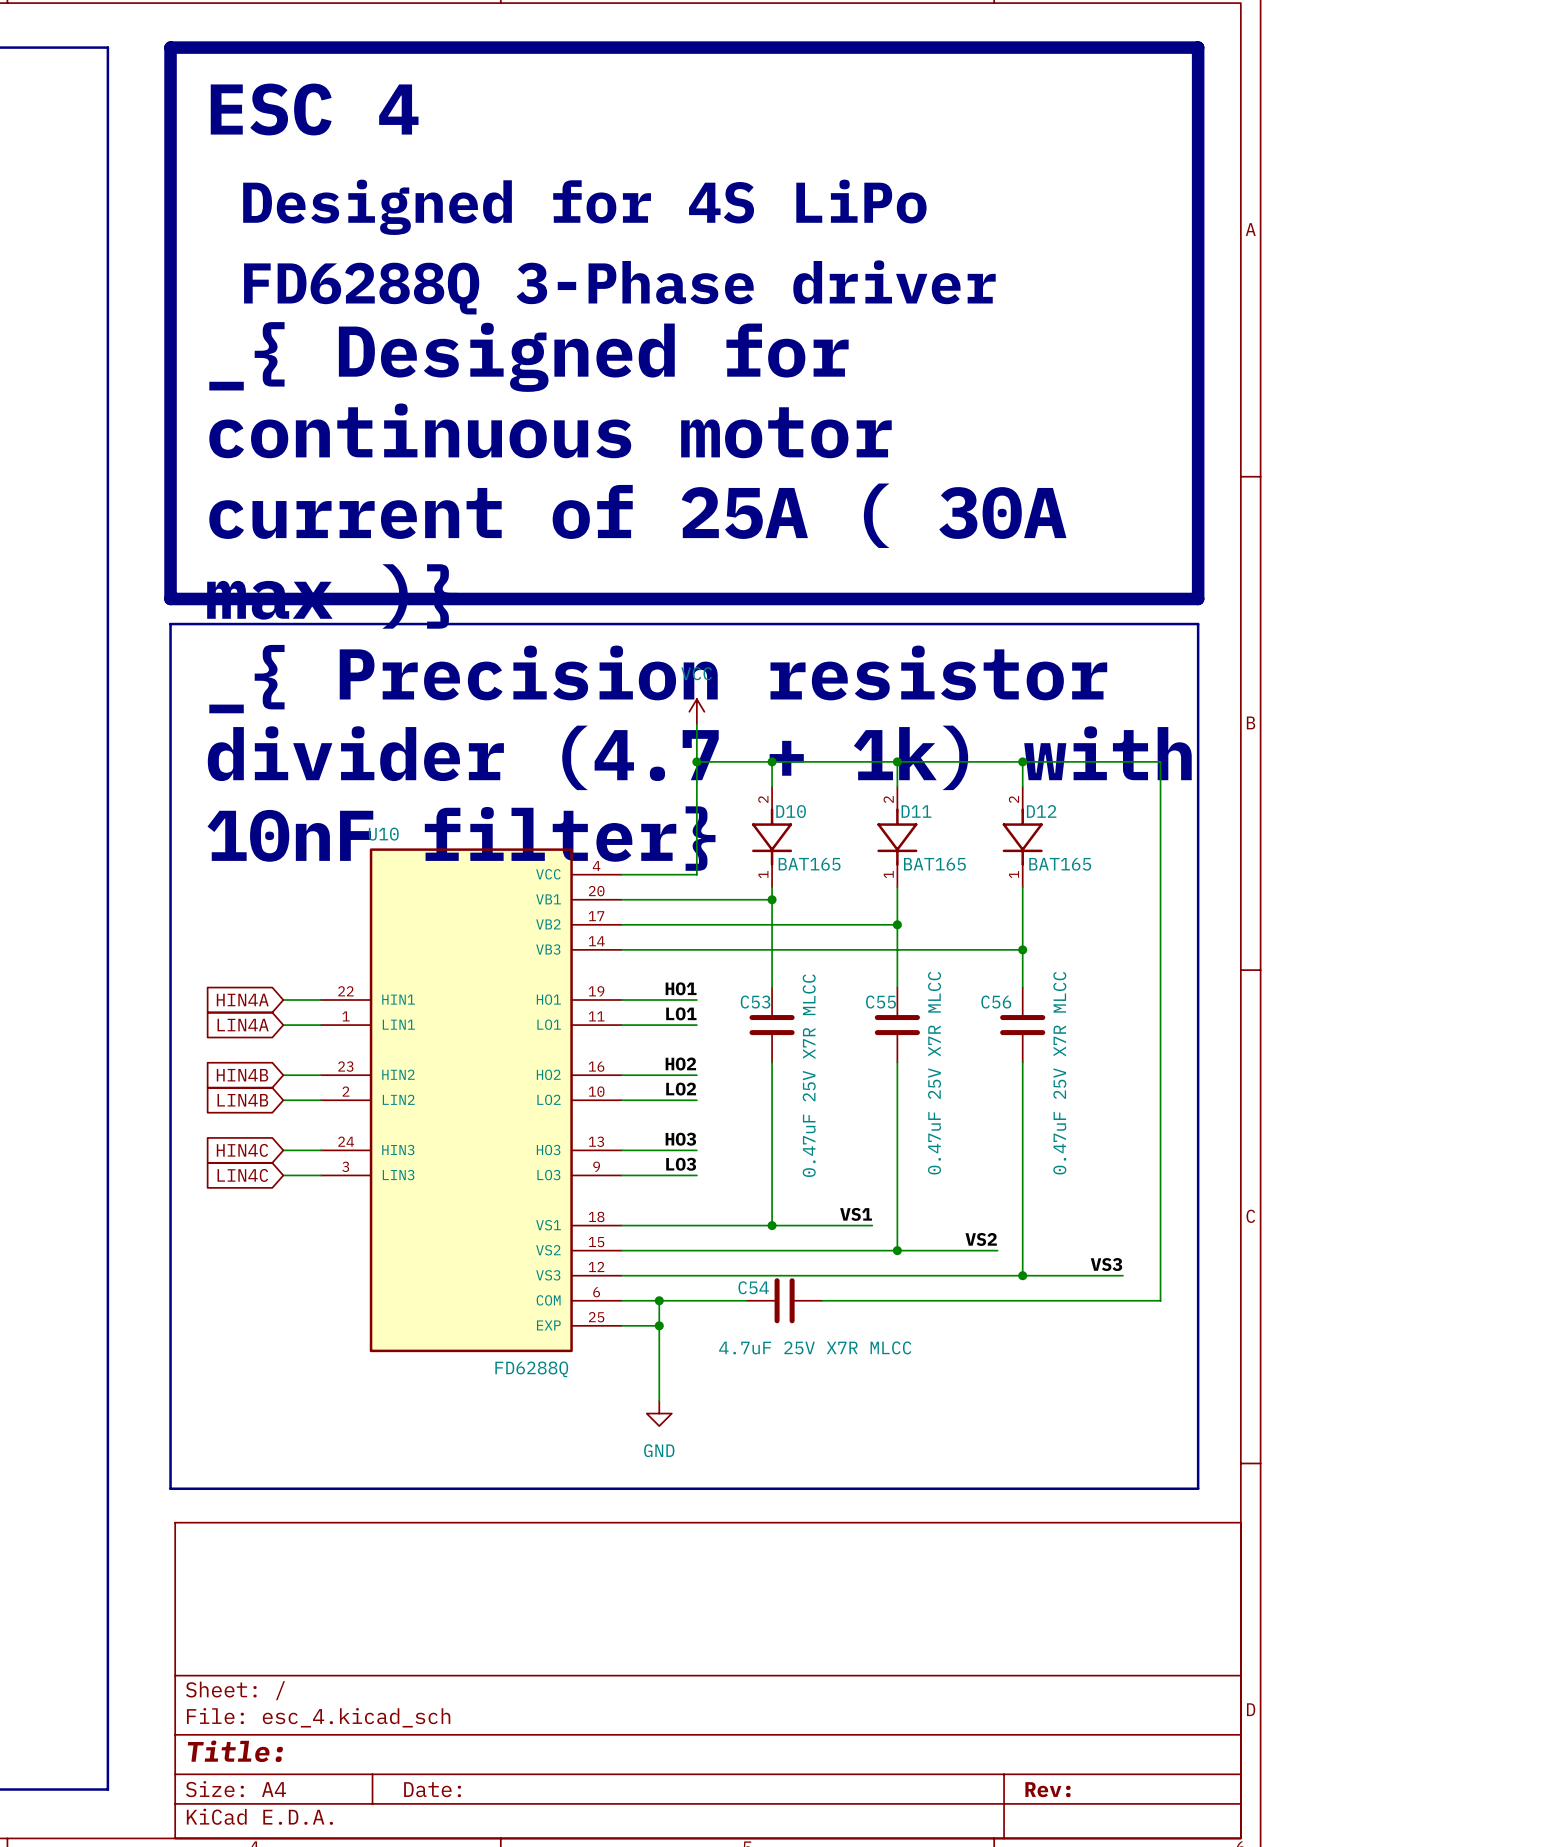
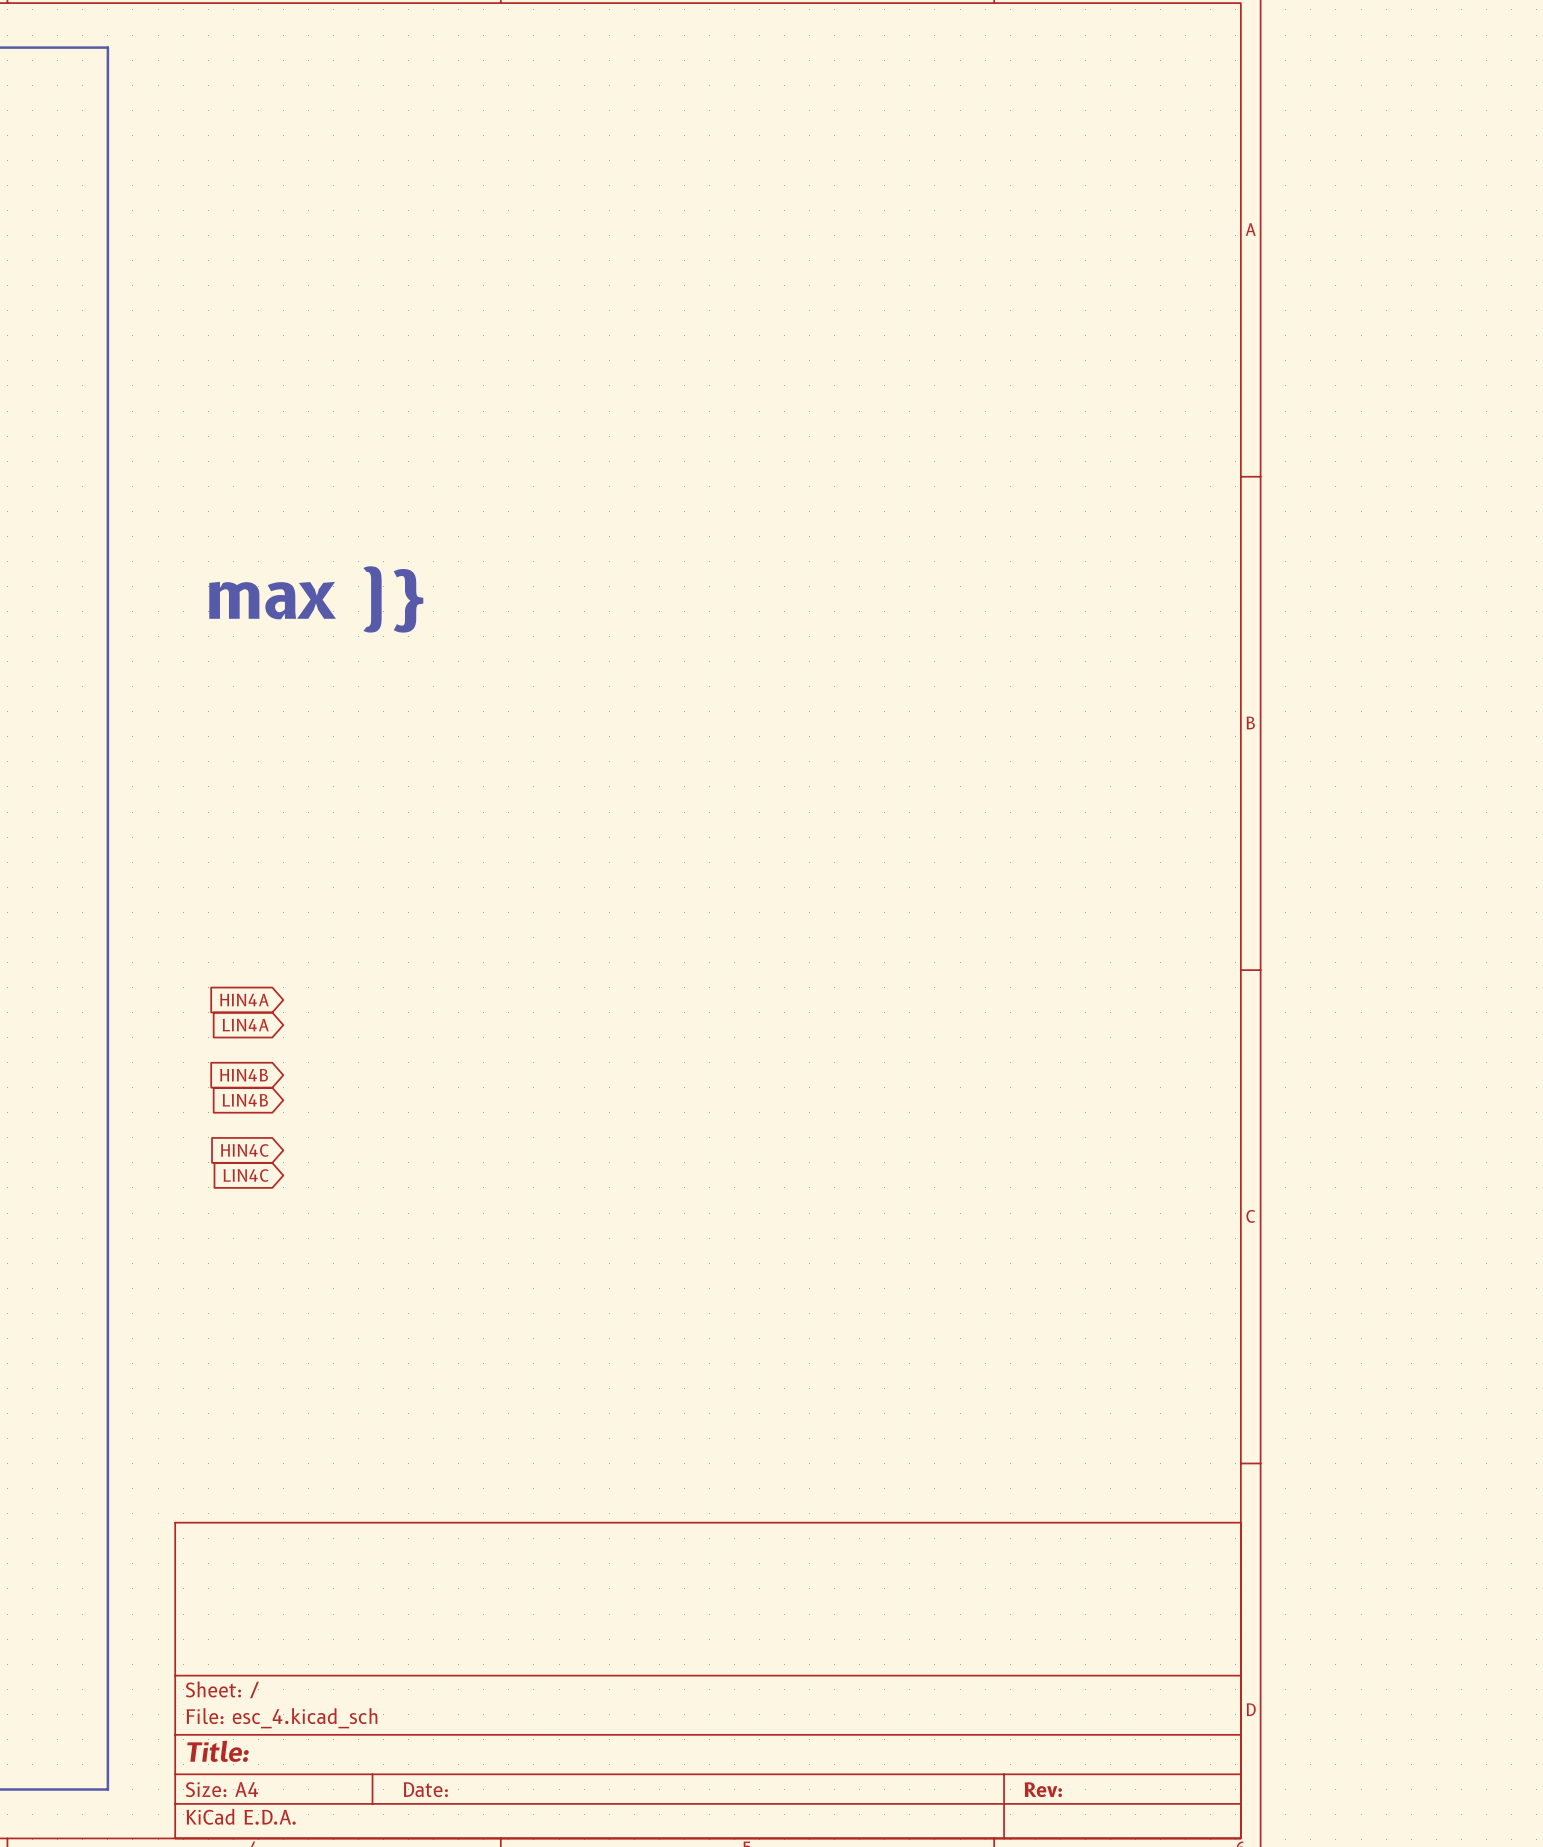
line: (170, 47) (1198, 47) (1198, 598) (170, 598) (170, 47) -> none
text: ESC 4 (314, 109) -> none
text: Designed for 4S LiPo (584, 207) -> none
text: FD6288Q 3-Phase driver (619, 287) -> none
text: _{ Designed for (528, 357) -> none
text: continuous motor (550, 430) -> none
text: current of 25A ( 30A (637, 515) -> none
line: (170, 624) (1198, 624) (1198, 1488) (170, 1488) (170, 624) -> none
text: _{ Precision resistor (658, 679) -> none
power symbol: VCC (696, 711) -> none
wire: (696, 724) (696, 874) (621, 874) -> none
text: divider (4.7 + 1k) with (699, 757) -> none
wire: (696, 761) (1160, 761) (1160, 1300) (822, 1300) -> none
junction: (696, 761) -> none
wire: (772, 761) (772, 786) -> none
junction: (772, 761) -> none
wire: (897, 761) (897, 786) -> none
junction: (897, 761) -> none
wire: (1022, 761) (1022, 786) -> none
junction: (1022, 761) -> none
D10: BAT165 (772, 837) -> none
D11: BAT165 (897, 837) -> none
D12: BAT165 (1022, 837) -> none
text: 10nF filter} (461, 838) -> none
wire: (772, 887) (772, 987) -> none
wire: (897, 887) (897, 987) -> none
wire: (1022, 887) (1022, 987) -> none
wire: (621, 899) (772, 899) -> none
junction: (772, 899) -> none
wire: (621, 924) (897, 924) -> none
junction: (897, 924) -> none
wire: (621, 949) (1022, 949) -> none
junction: (1022, 949) -> none
label: HO1 (681, 988) -> none
wire: (283, 1000) (320, 1000) -> none
wire: (621, 1000) (696, 1000) -> none
label: LO1 (681, 1013) -> none
wire: (283, 1025) (320, 1025) -> none
wire: (621, 1025) (696, 1025) -> none
C53: 0.47uF 25V X7R MLCC (772, 1025) -> none
C55: 0.47uF 25V X7R MLCC (897, 1025) -> none
C56: 0.47uF 25V X7R MLCC (1022, 1025) -> none
wire: (772, 1062) (772, 1225) -> none
wire: (897, 1062) (897, 1250) -> none
wire: (1022, 1062) (1022, 1275) -> none
label: HO2 (680, 1064) -> none
wire: (283, 1075) (320, 1075) -> none
wire: (621, 1075) (696, 1075) -> none
label: LO2 (681, 1089) -> none
wire: (283, 1100) (320, 1100) -> none
U10: FD6288Q (471, 1100) -> none
wire: (621, 1100) (696, 1100) -> none
label: HO3 (680, 1139) -> none
wire: (283, 1150) (320, 1150) -> none
wire: (621, 1150) (696, 1150) -> none
label: LO3 (681, 1164) -> none
wire: (283, 1175) (320, 1175) -> none
wire: (621, 1175) (696, 1175) -> none
label: VS1 (856, 1214) -> none
wire: (621, 1225) (872, 1225) -> none
junction: (772, 1225) -> none
label: VS2 (981, 1239) -> none
wire: (621, 1250) (997, 1250) -> none
junction: (897, 1250) -> none
label: VS3 (1106, 1264) -> none
wire: (621, 1275) (1122, 1275) -> none
junction: (1022, 1275) -> none
wire: (621, 1300) (747, 1300) -> none
wire: (659, 1300) (659, 1401) -> none
junction: (659, 1300) -> none
C54: 4.7uF 25V X7R MLCC (784, 1300) -> none
wire: (621, 1325) (659, 1325) -> none
junction: (659, 1325) -> none
power symbol: GND (659, 1413) -> none

